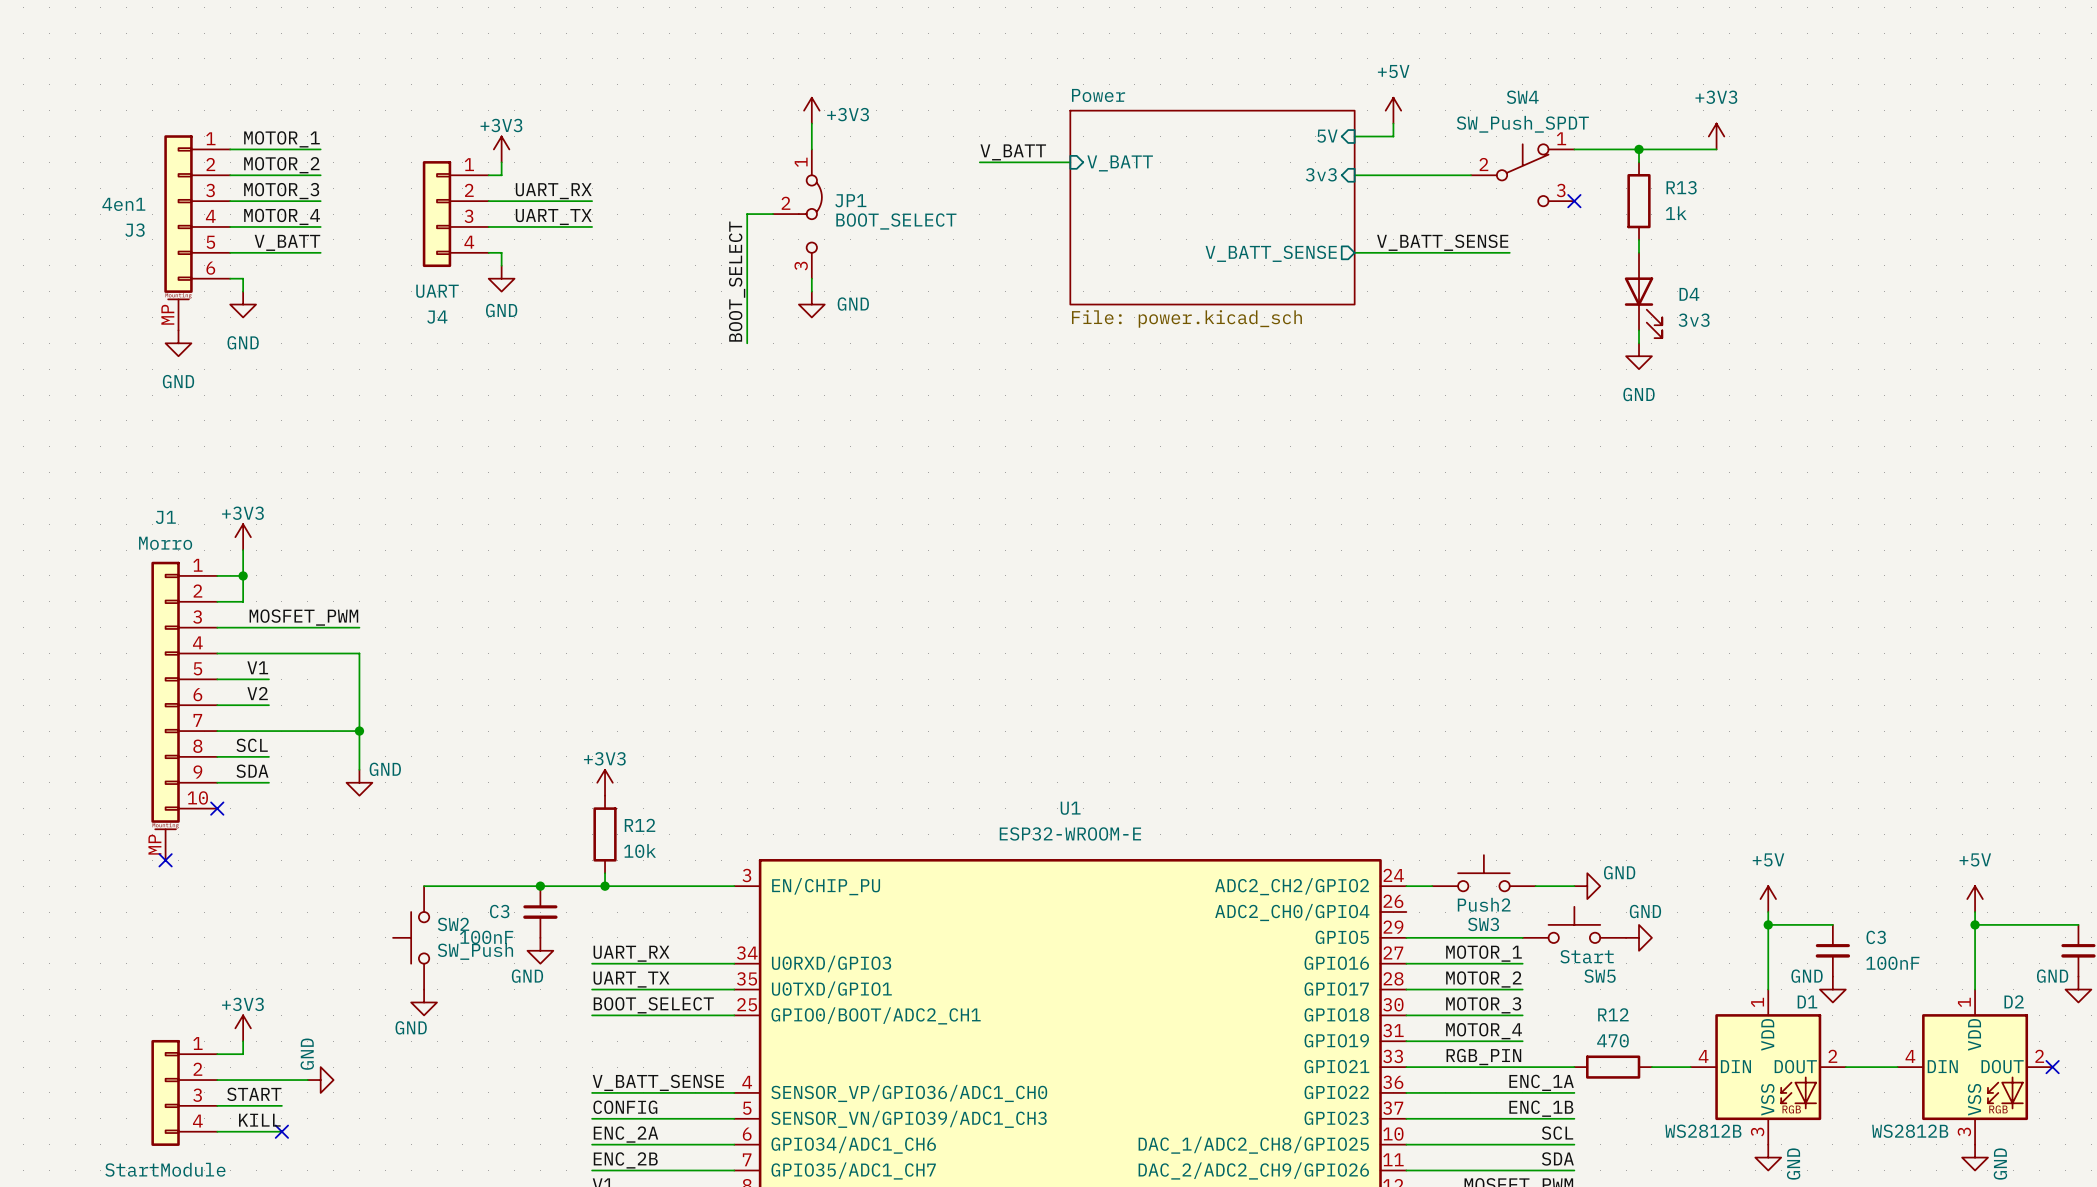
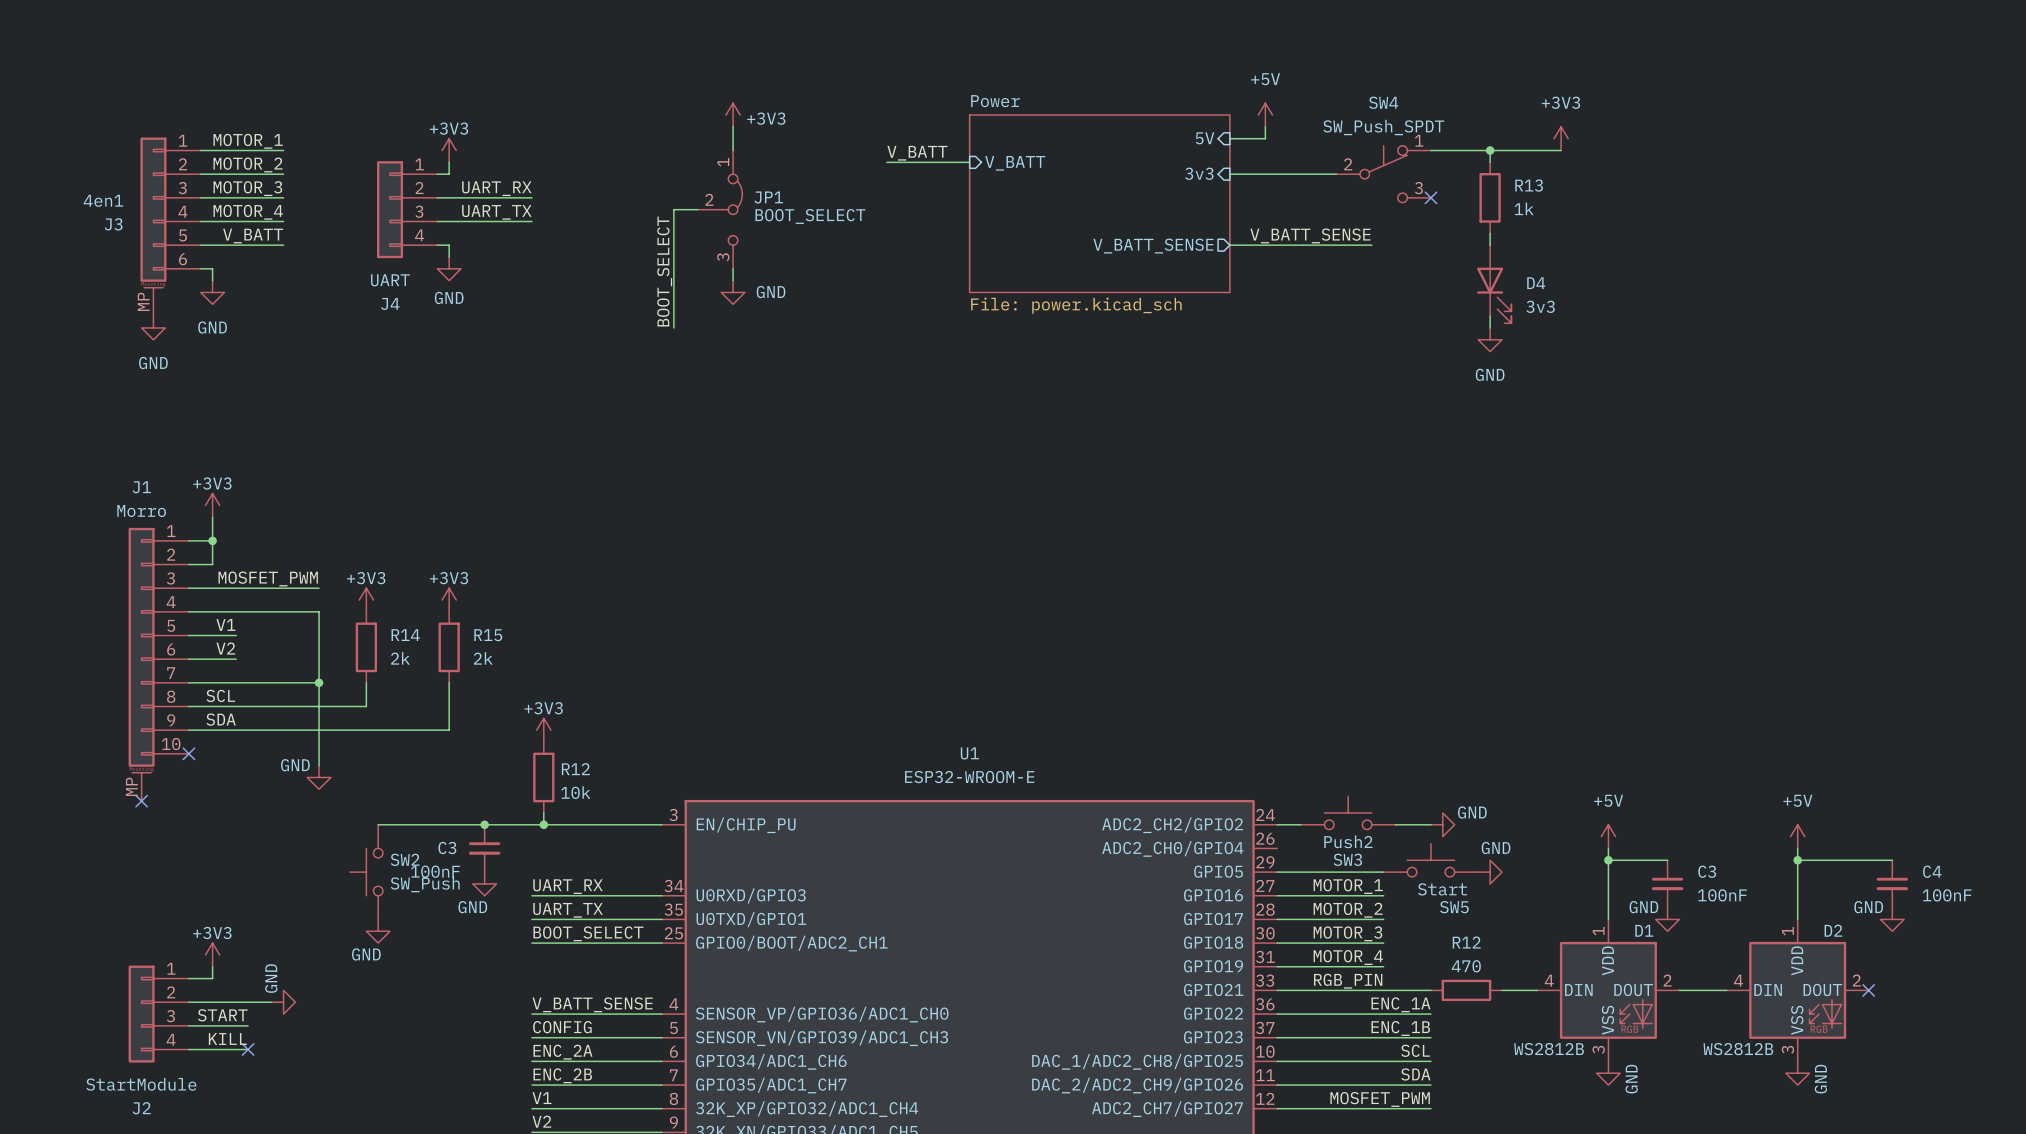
power symbol: none -> +3V3 (366, 600)
power symbol: none -> +3V3 (449, 600)
R14: none -> 2k (366, 647)
R15: none -> 2k (449, 647)
wire: none -> (366, 682) (366, 706) (236, 706)
wire: none -> (449, 682) (449, 730) (236, 730)
wire: none -> (319, 718) (319, 765)
power symbol text position: GND (385, 769) -> GND (295, 765)
power symbol position: GND (359, 782) -> GND (319, 777)

